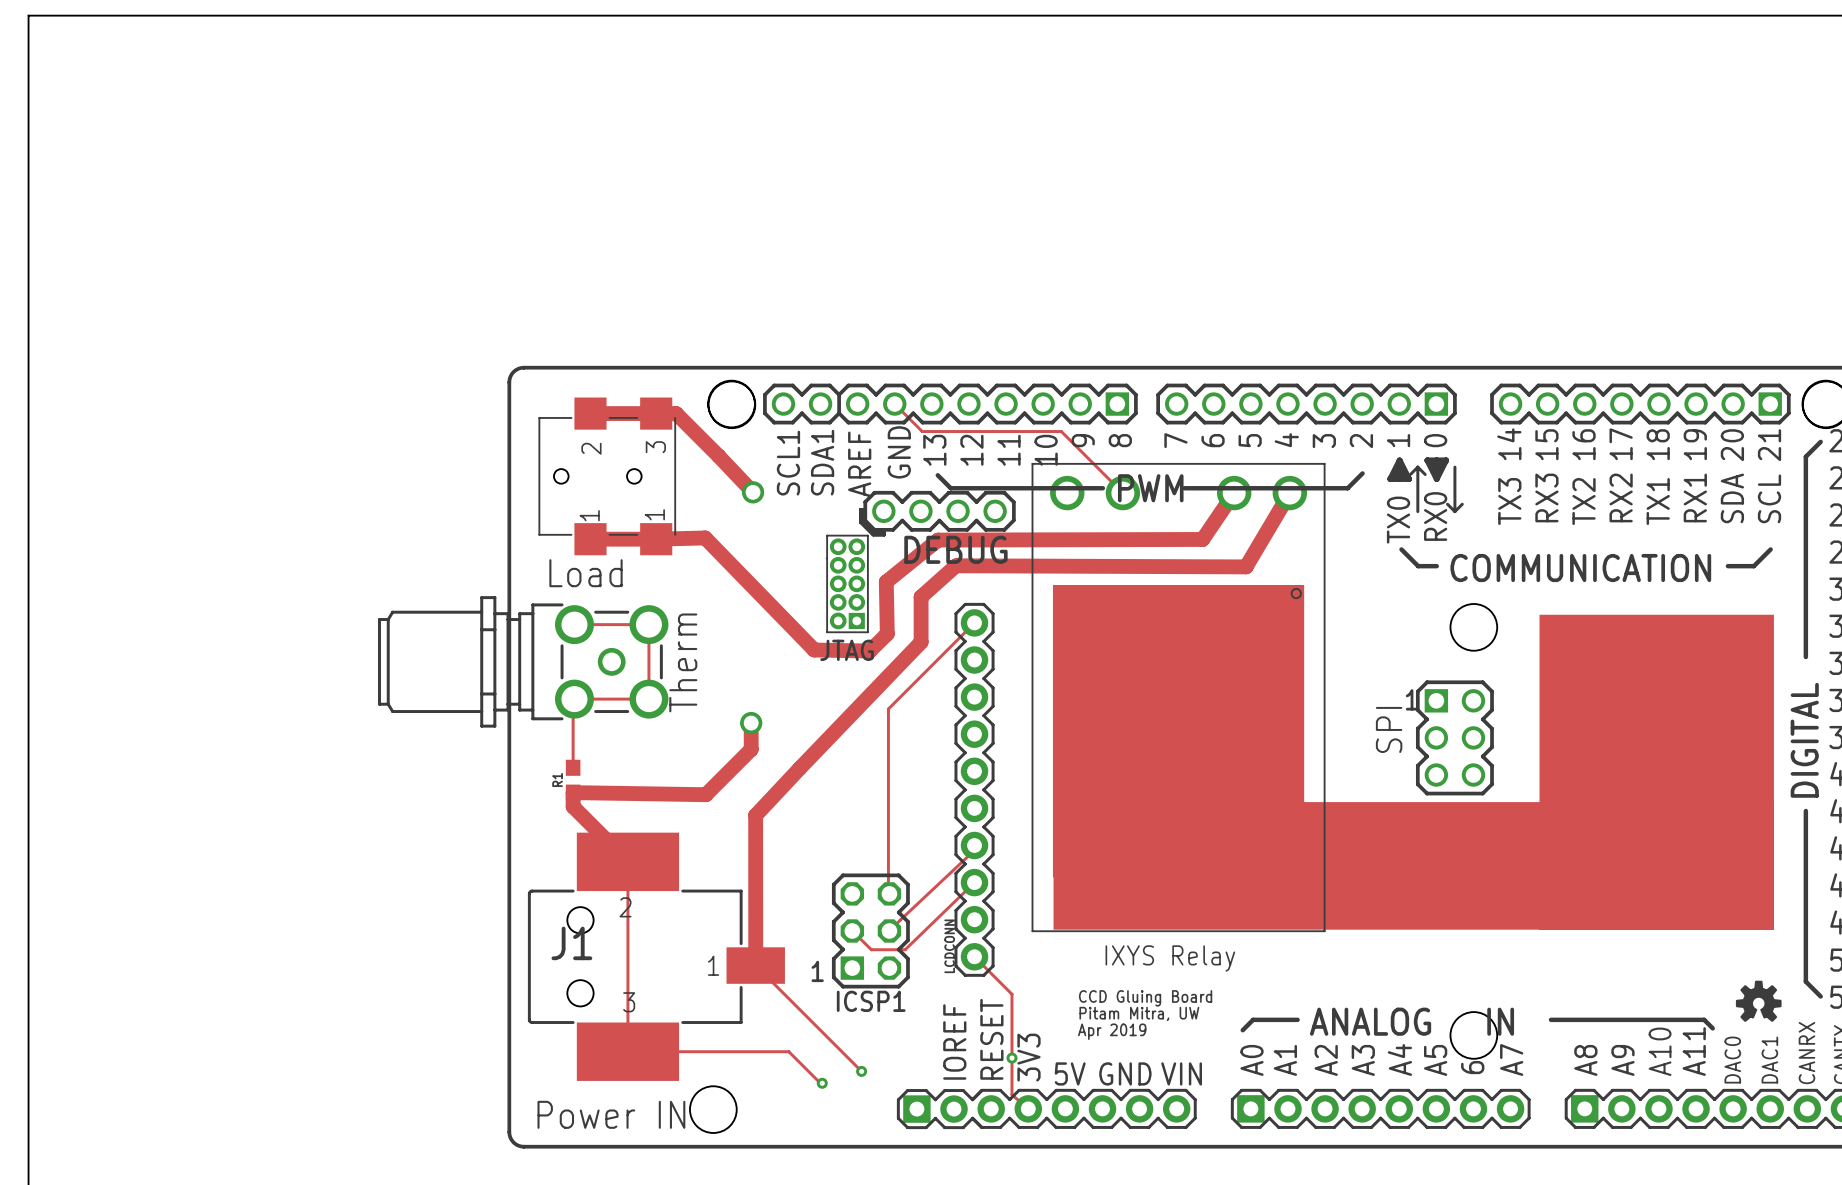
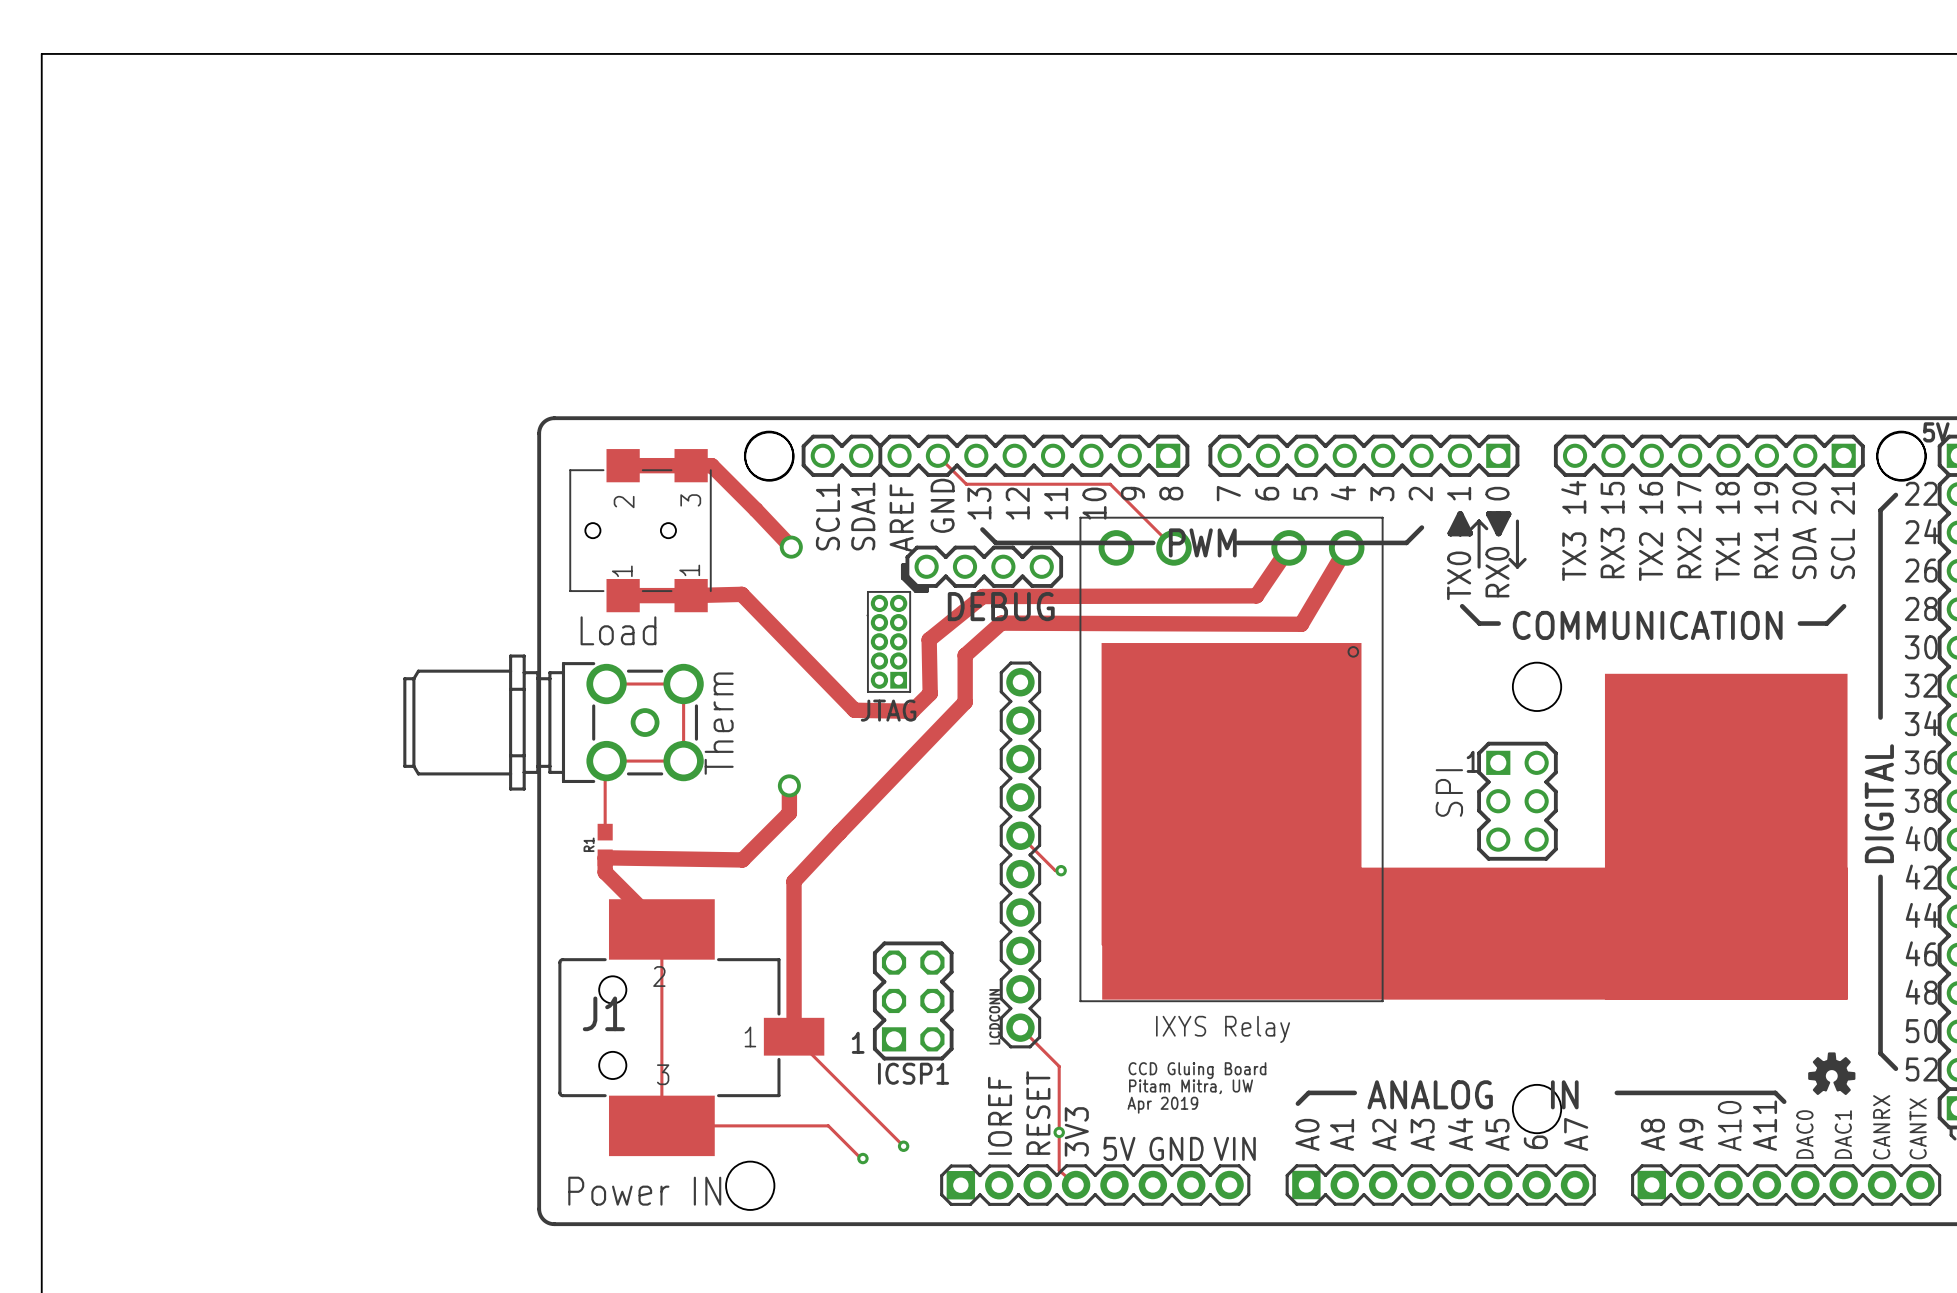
track: (974, 622) (888, 708) (889, 893) -> none
track: none -> (1020, 835) (1055, 870) (1061, 870)
via: none -> (1061, 870)
track: (974, 845) (973, 851) (889, 930) -> none
track: (974, 882) (905, 949) (871, 949) (852, 930) -> none

